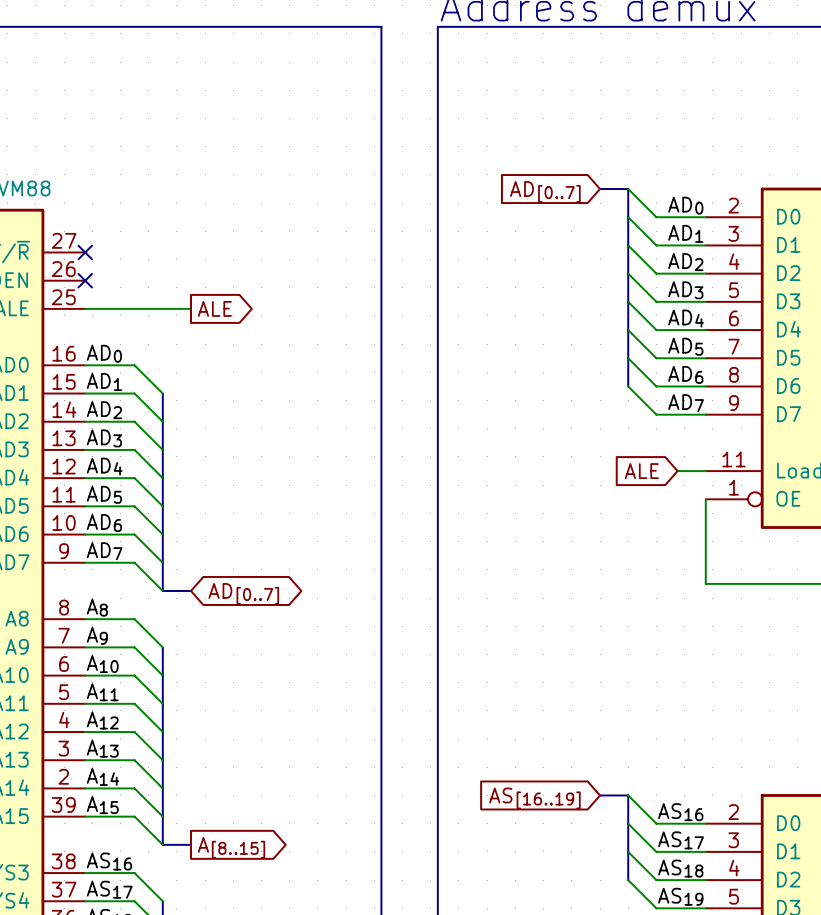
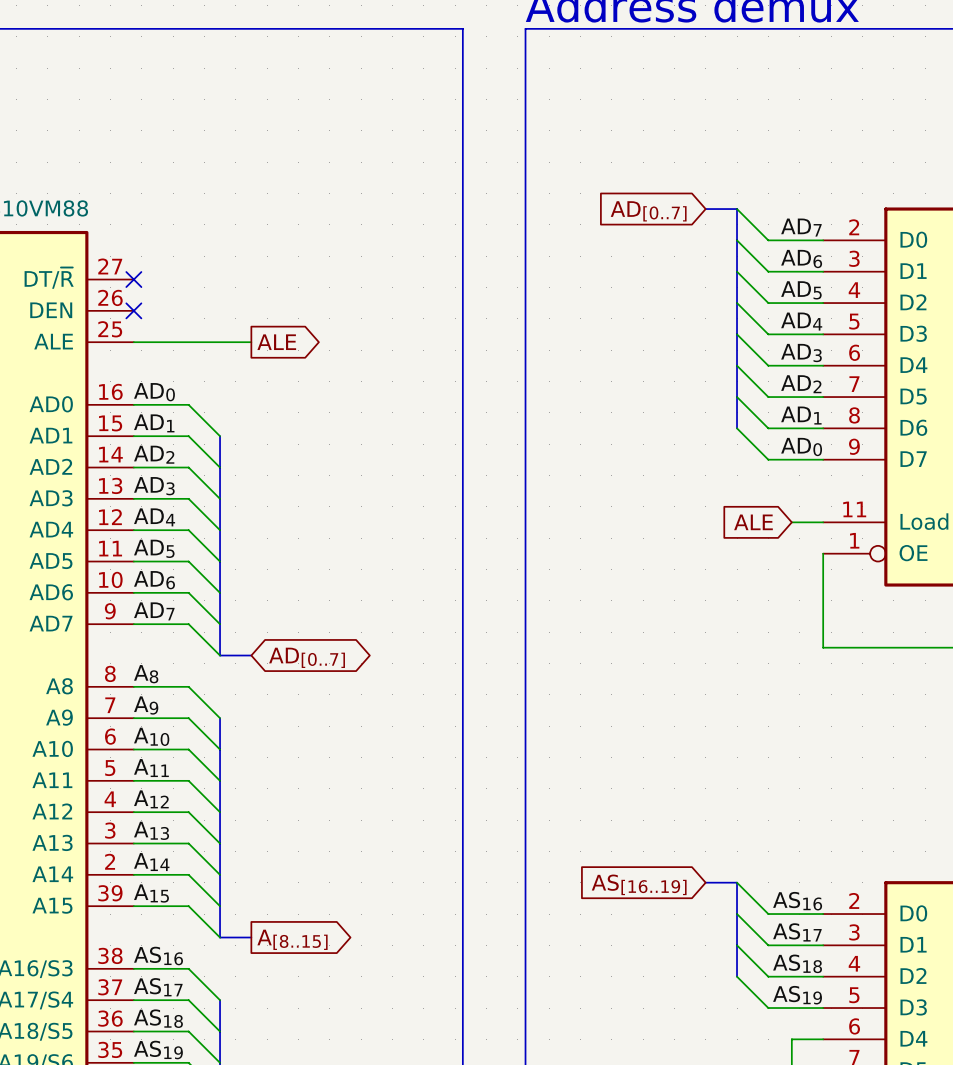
label: AD0 (685, 205) -> AD7 (801, 227)
label: AD1 (685, 233) -> AD6 (801, 259)
label: AD2 (685, 262) -> AD5 (801, 290)
label: AD3 (685, 290) -> AD4 (801, 321)
label: AD4 (686, 318) -> AD3 (801, 353)
label: AD5 (685, 346) -> AD2 (801, 384)
label: AD6 (685, 374) -> AD1 (801, 415)
label: AD7 (686, 403) -> AD0 (801, 447)

